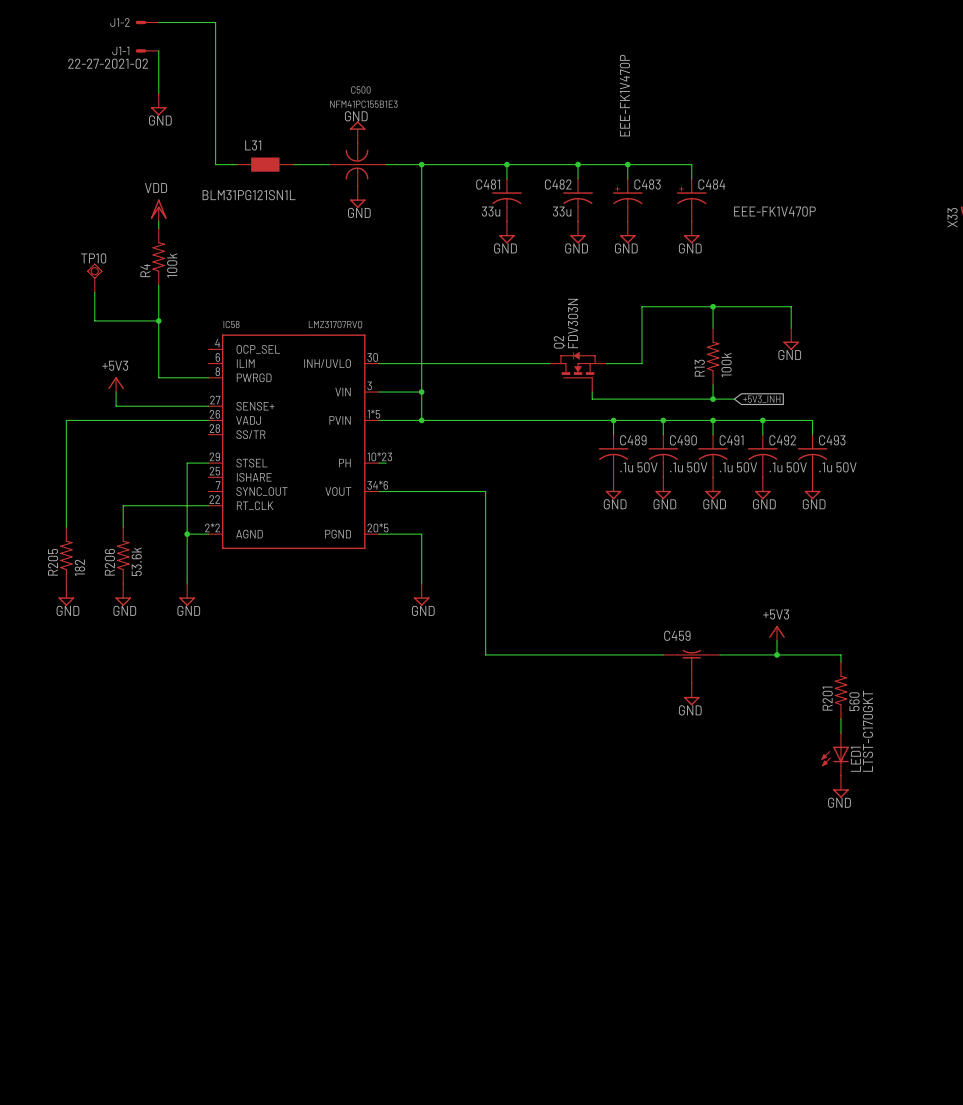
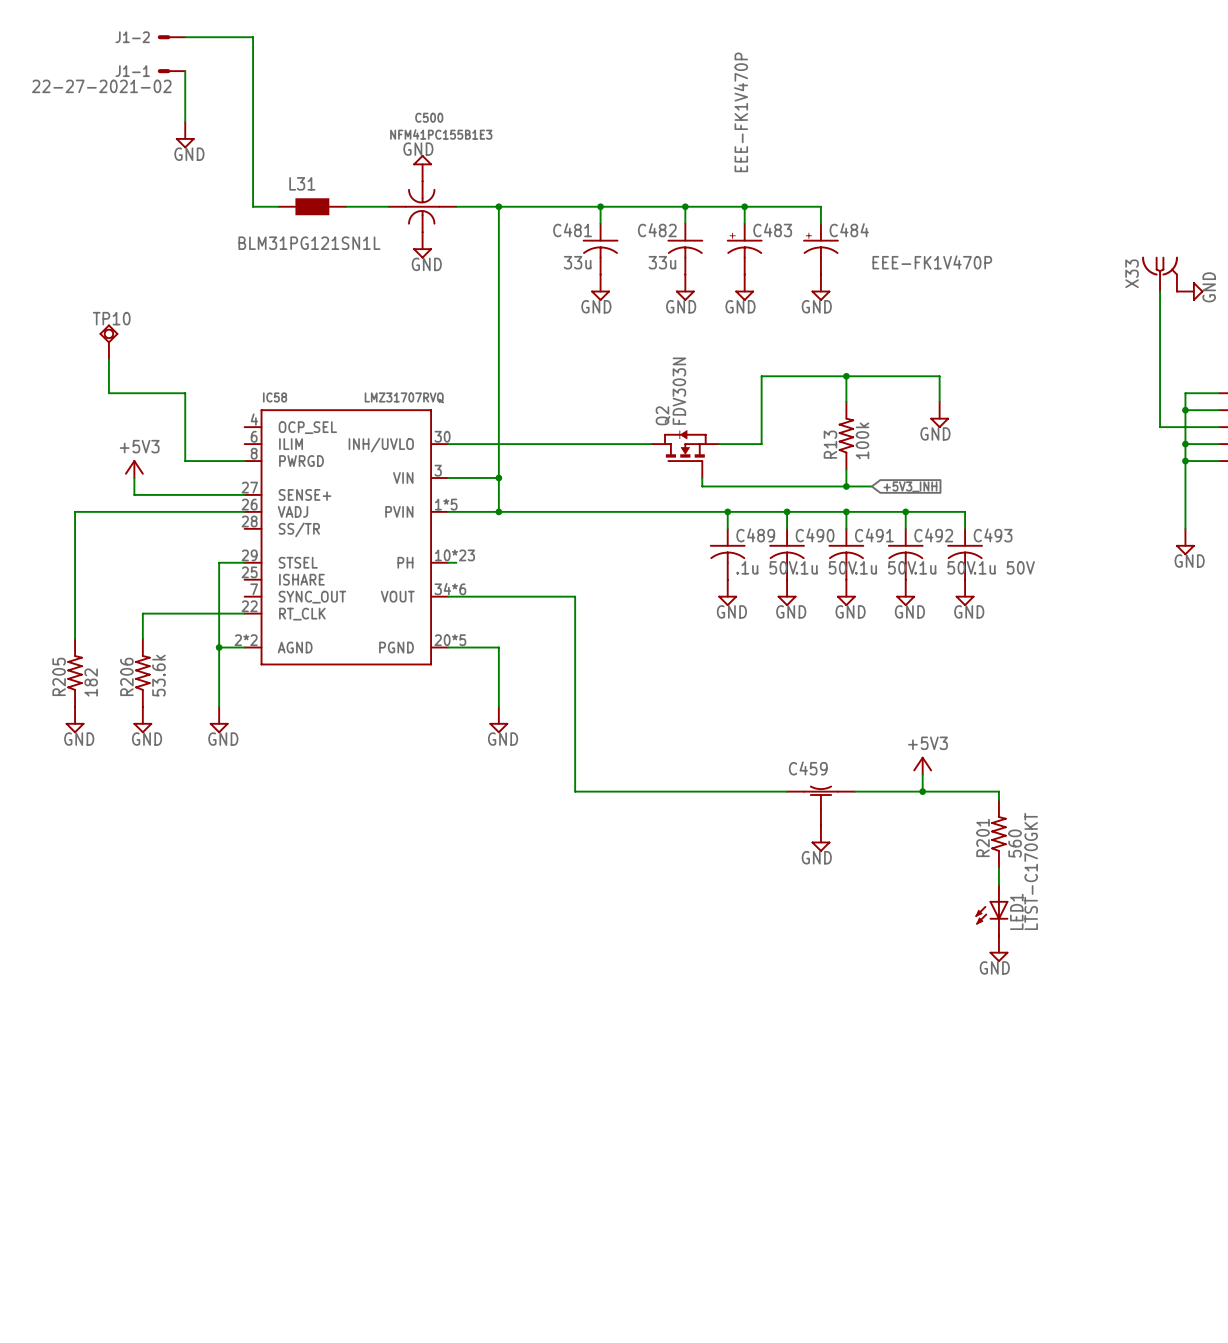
power symbol: VDD (158, 210) -> none
wire: (158, 221) (158, 228) -> none
R4: 100k (158, 256) -> none
wire: (158, 285) (158, 320) -> none
junction: (158, 320) -> none

